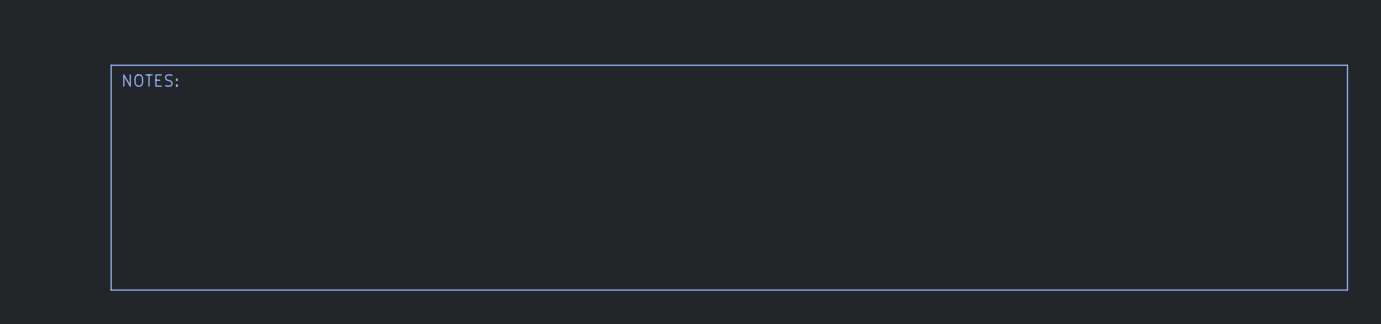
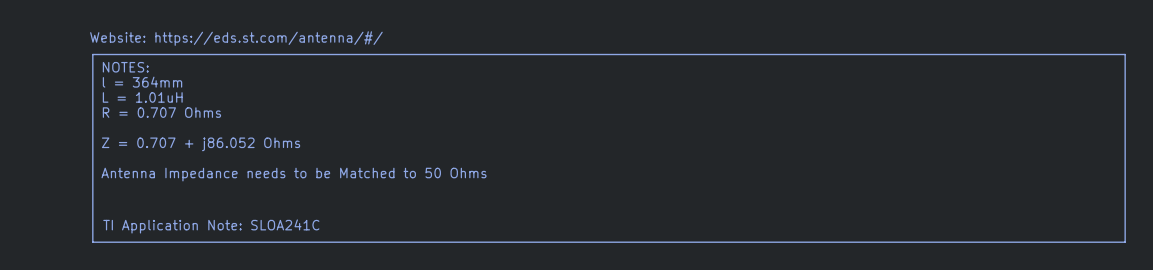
text: none -> Website: https://eds.st.com/antenna/#/ (236, 38)
text: none -> l = 364mm (142, 82)
text: none -> L = 1.01uH (142, 97)
text: none -> R = 0.707 Ohms (161, 112)
text: none -> Z = 0.707 + j86.052 Ohms (201, 144)
text: none -> Antenna Impedance needs to be Matched to 50 Ohms (294, 174)
text: none -> TI Application Note: SLOA241C (211, 226)

